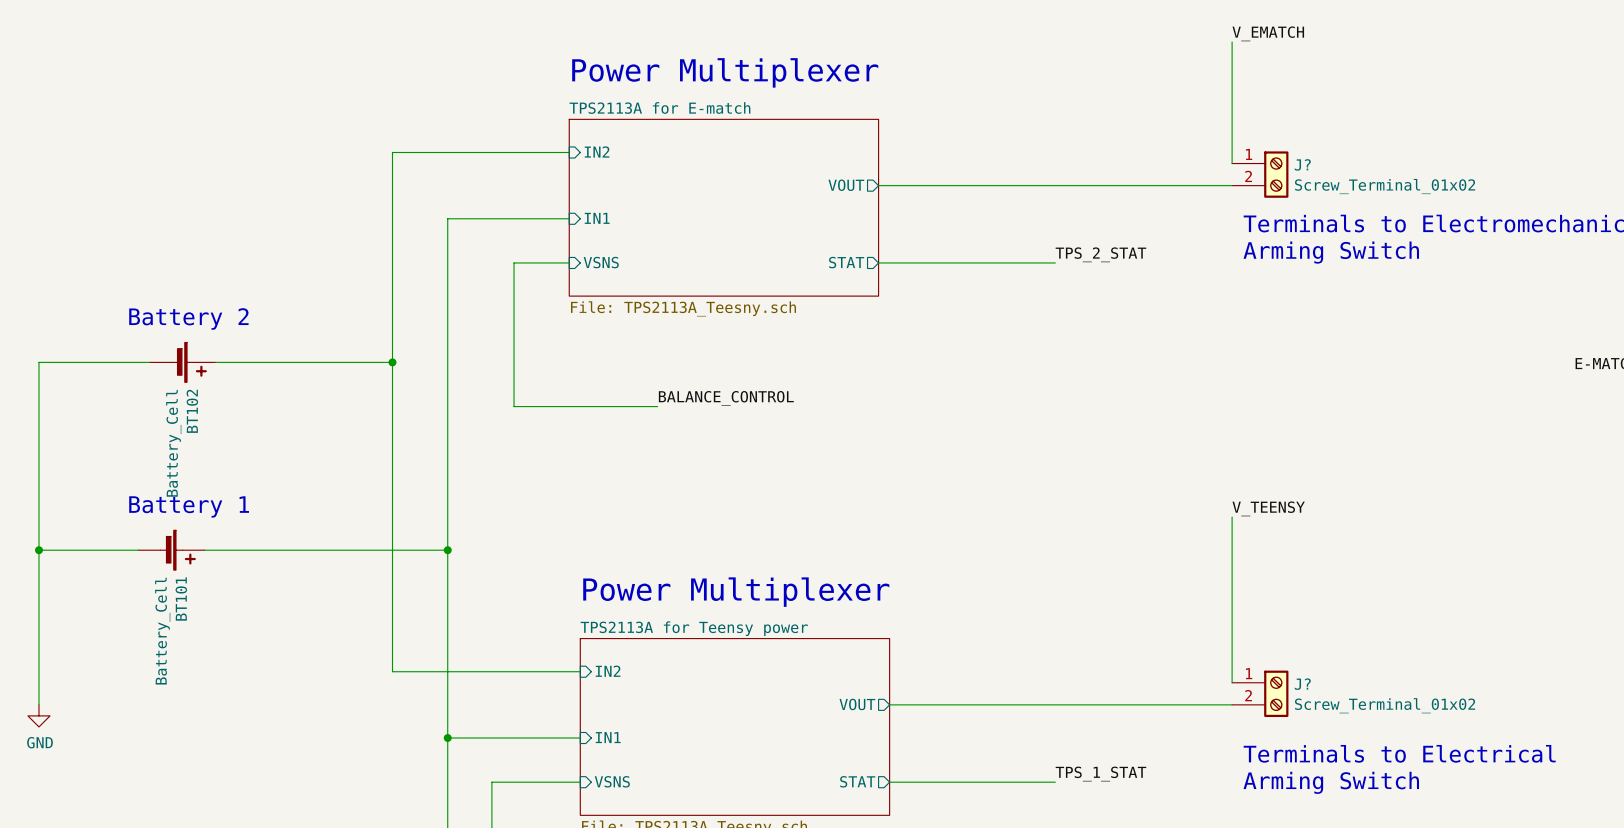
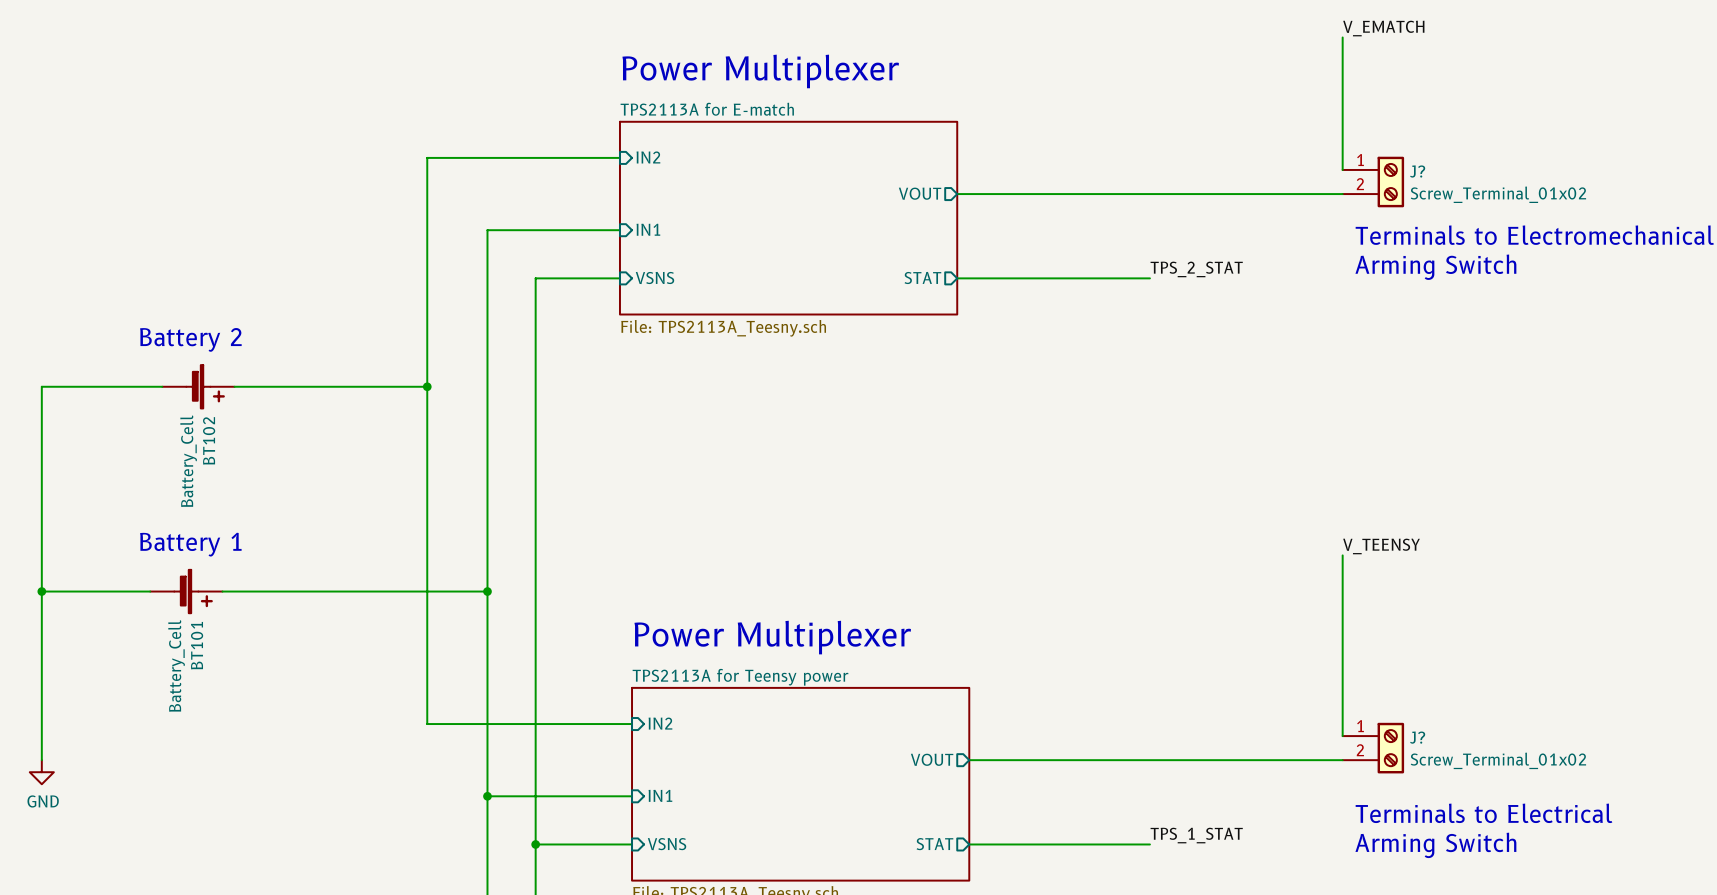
wire: (514, 262) (514, 406) (657, 406) -> (559, 278) (535, 278) (535, 844)
label: BALANCE_CONTROL (726, 398) -> none
junction: none -> (535, 844)

